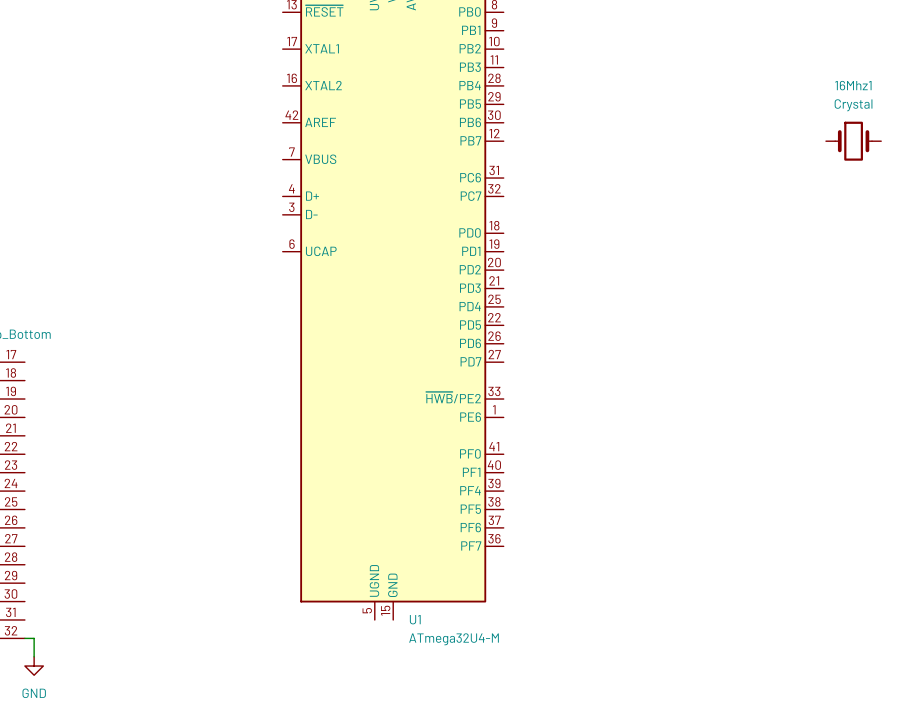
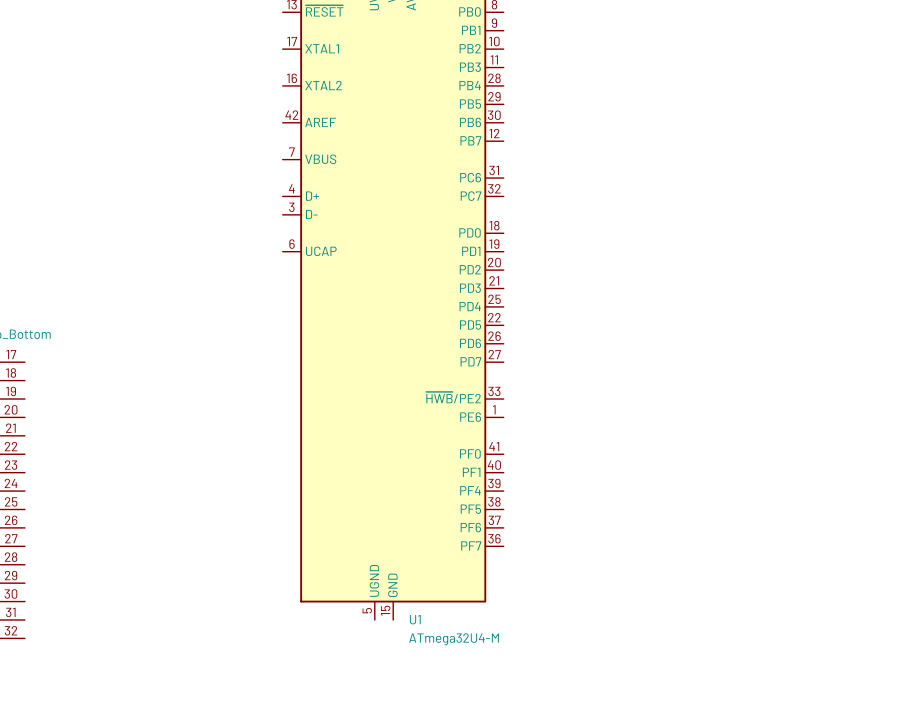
16Mhz1: Crystal (853, 141) -> none
wire: (24, 638) (34, 638) (34, 656) -> none
power symbol: GND (34, 666) -> none

